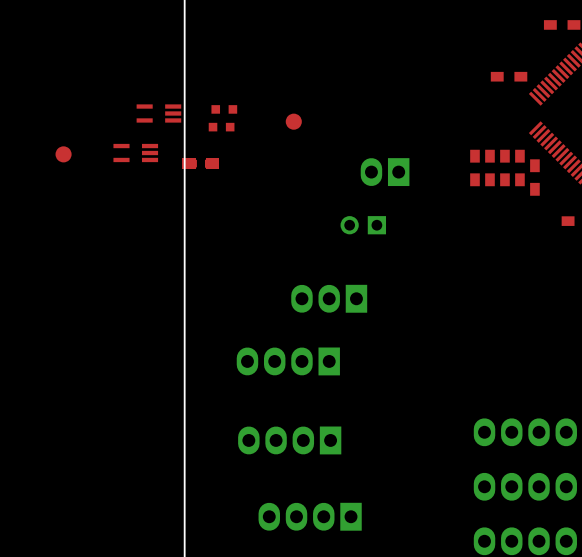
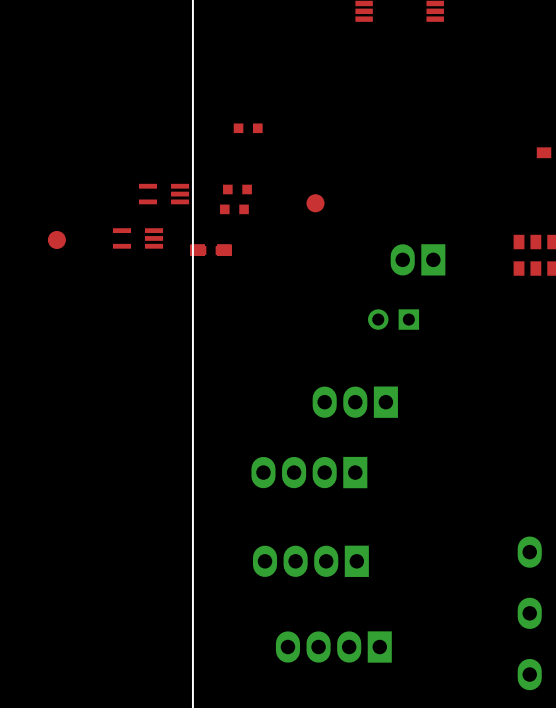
part: none -> (248, 128)

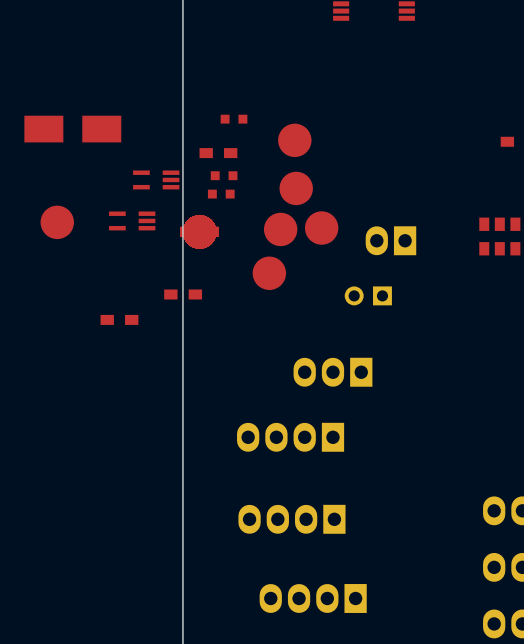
part: none -> (72, 129)
part: none -> (294, 140)
part: none -> (218, 153)
part footprint: [306, 194, 325, 213] -> [279, 171, 313, 206]
part footprint: [47, 230, 66, 250] -> [40, 205, 74, 240]
part: none -> (321, 228)
part: none -> (280, 229)
part: none -> (199, 231)
part: none -> (269, 273)
part: none -> (183, 294)
part: none -> (119, 319)

